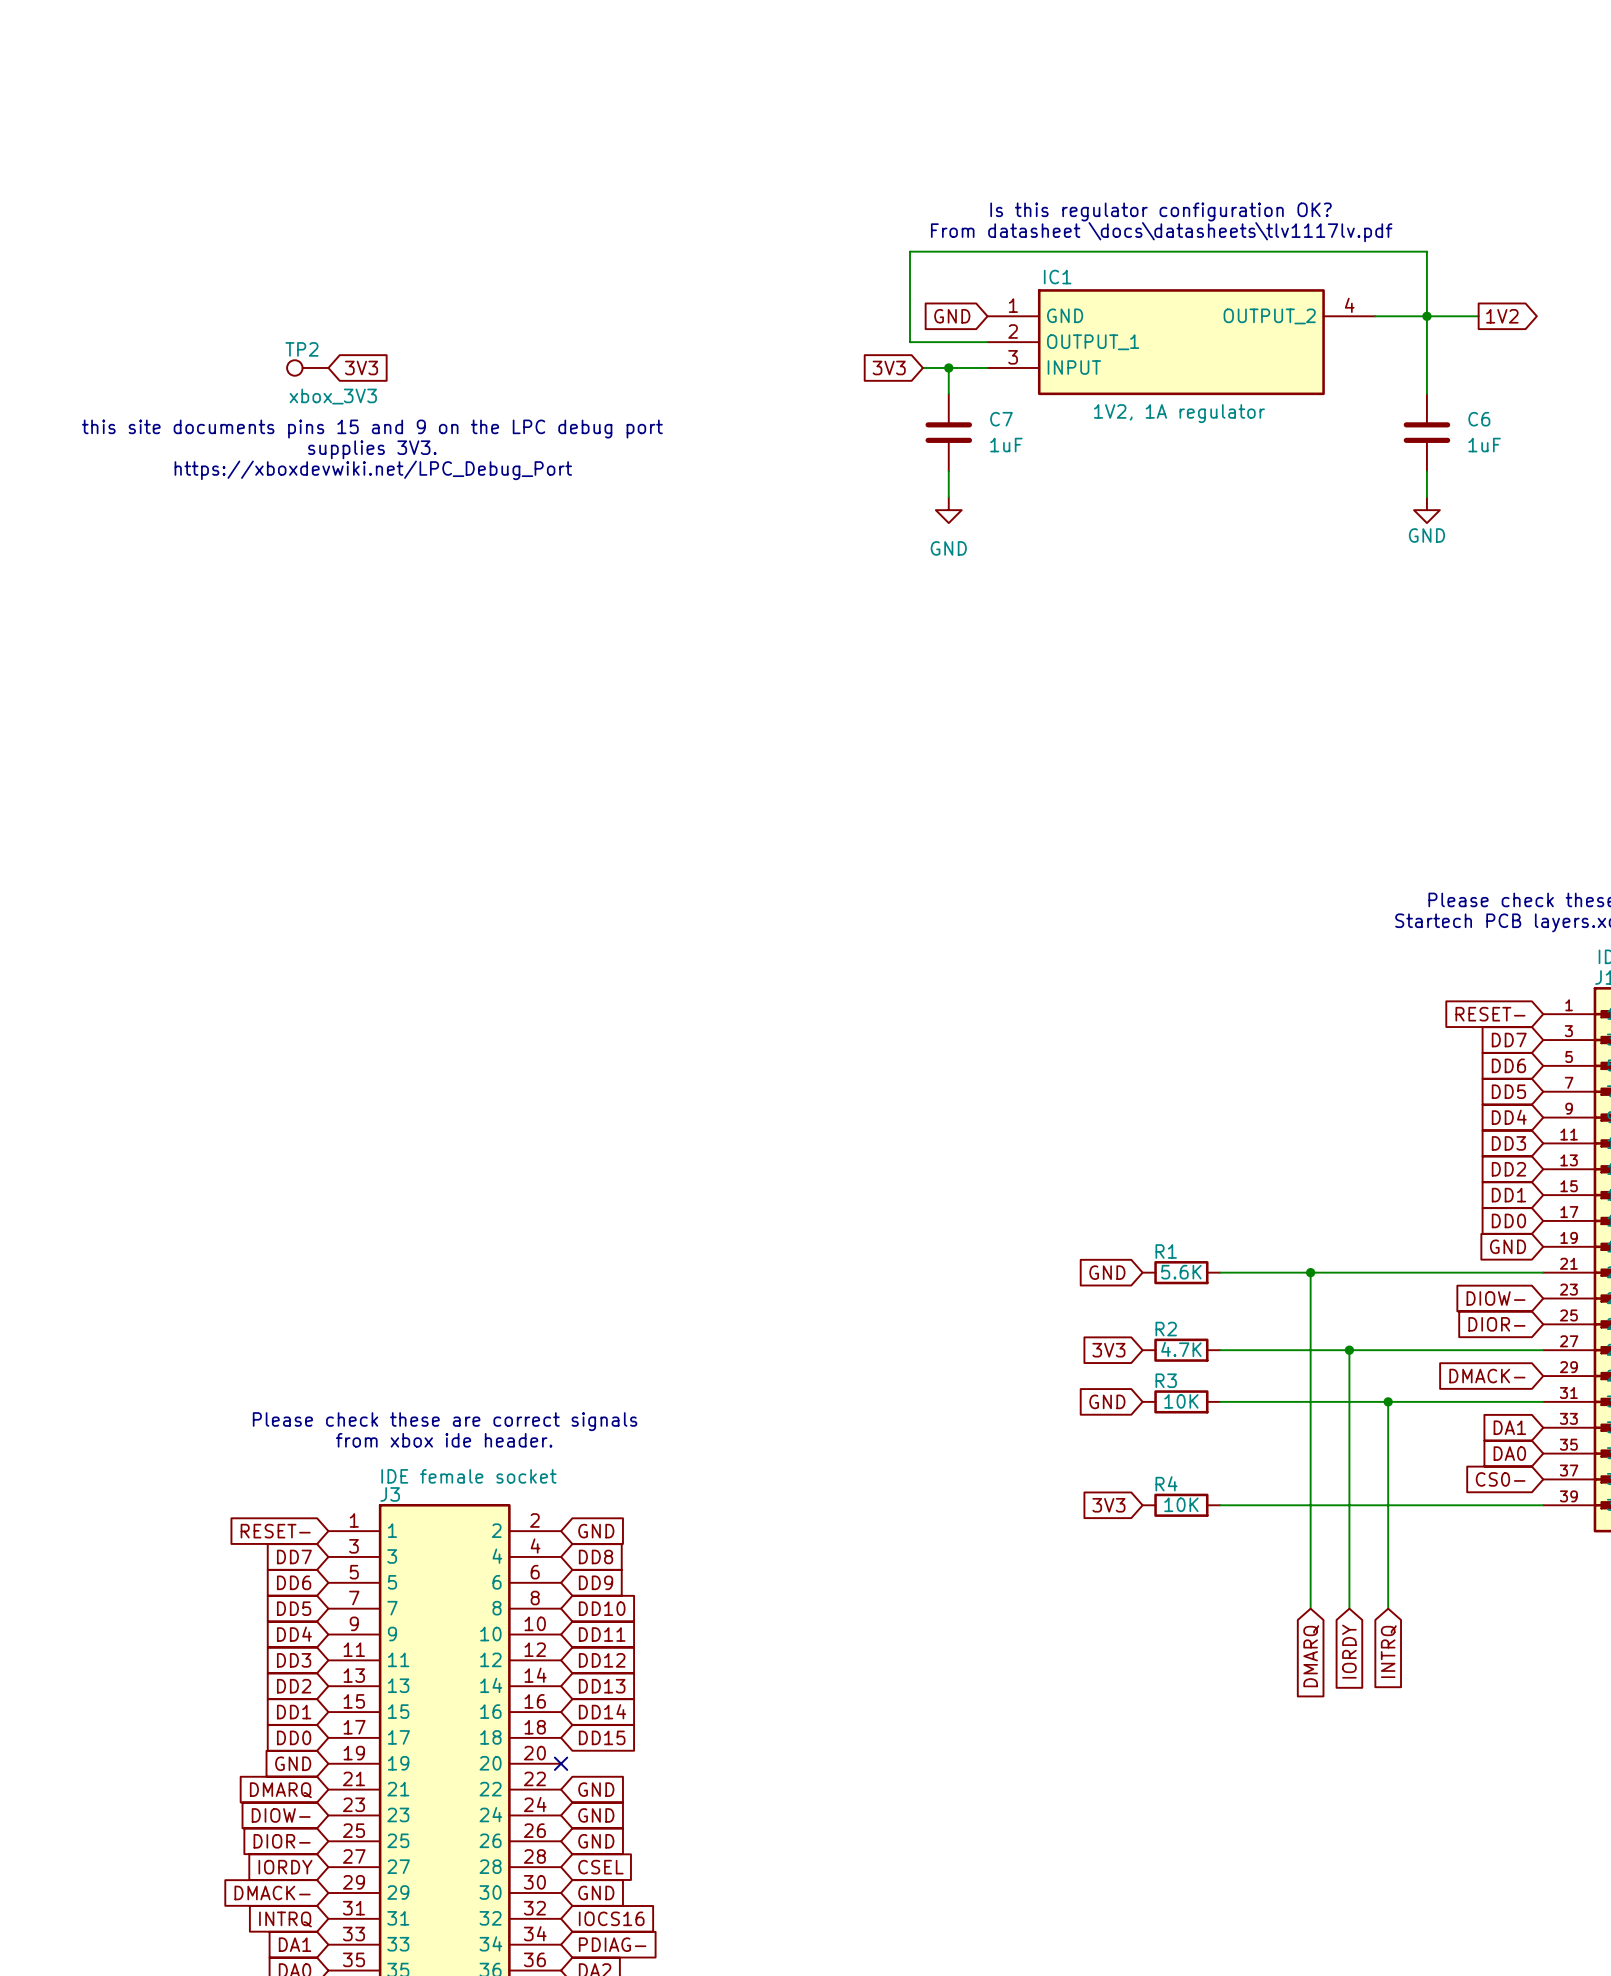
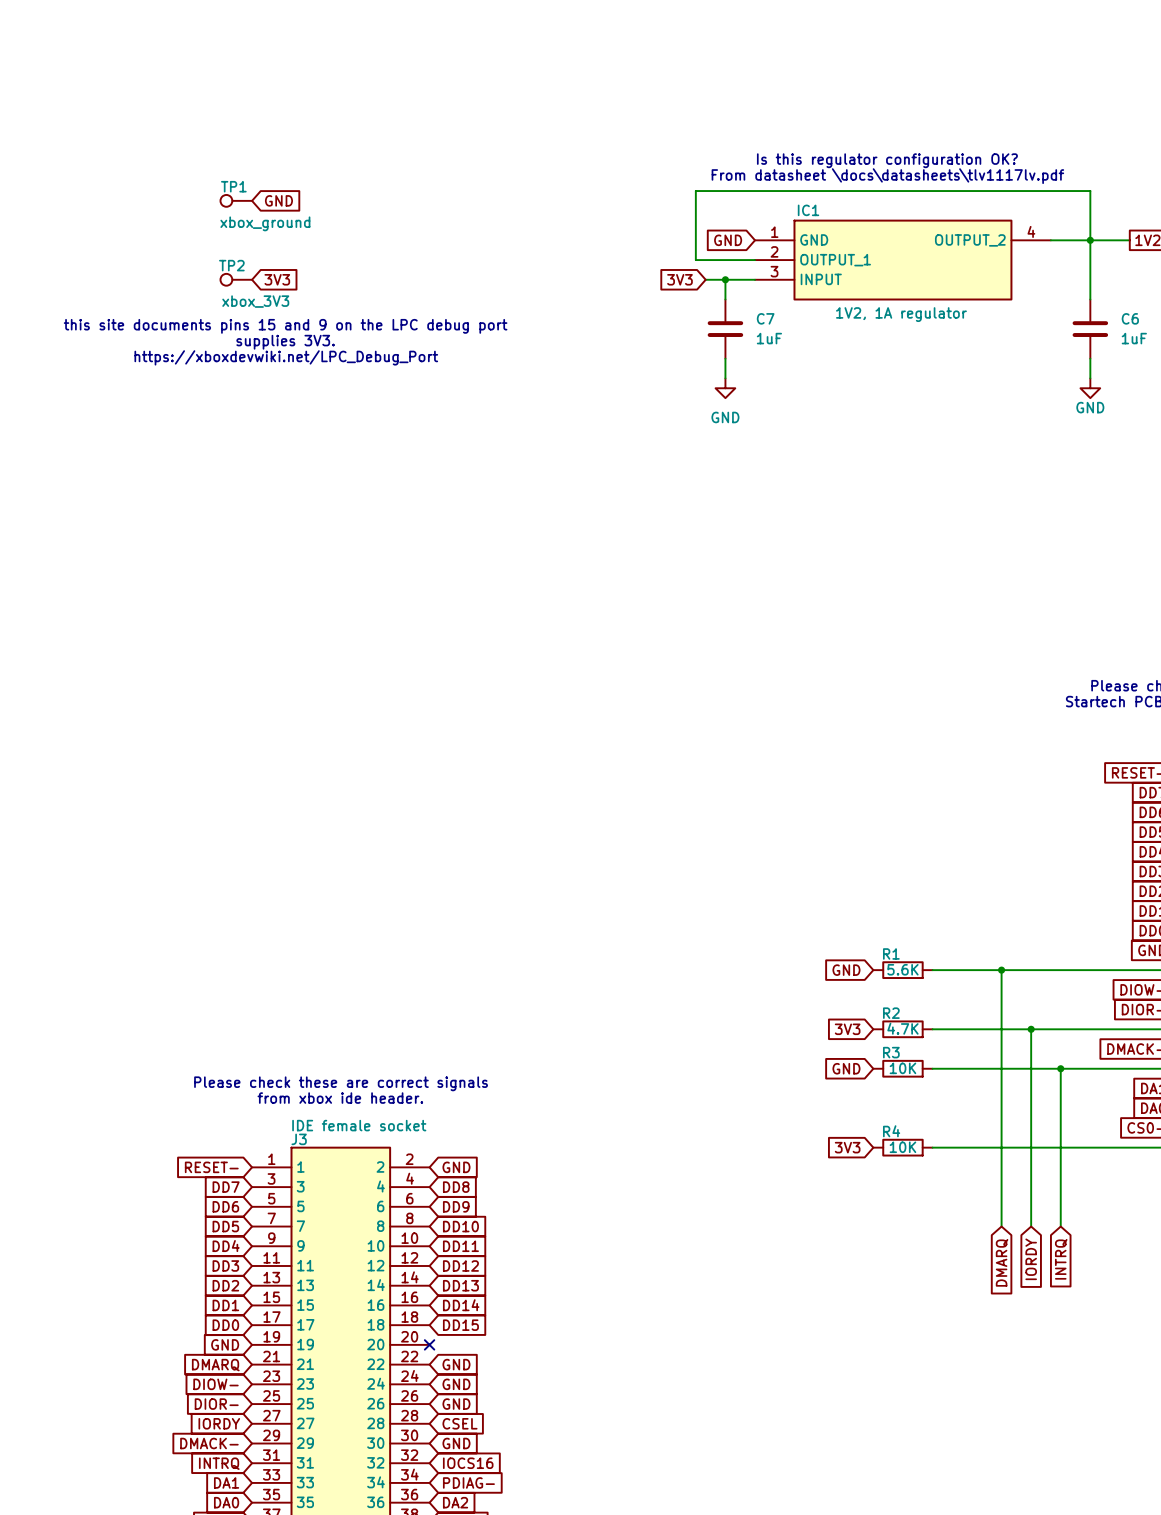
TP1: none -> xbox_ground (236, 200)
global label: none -> GND (278, 200)

